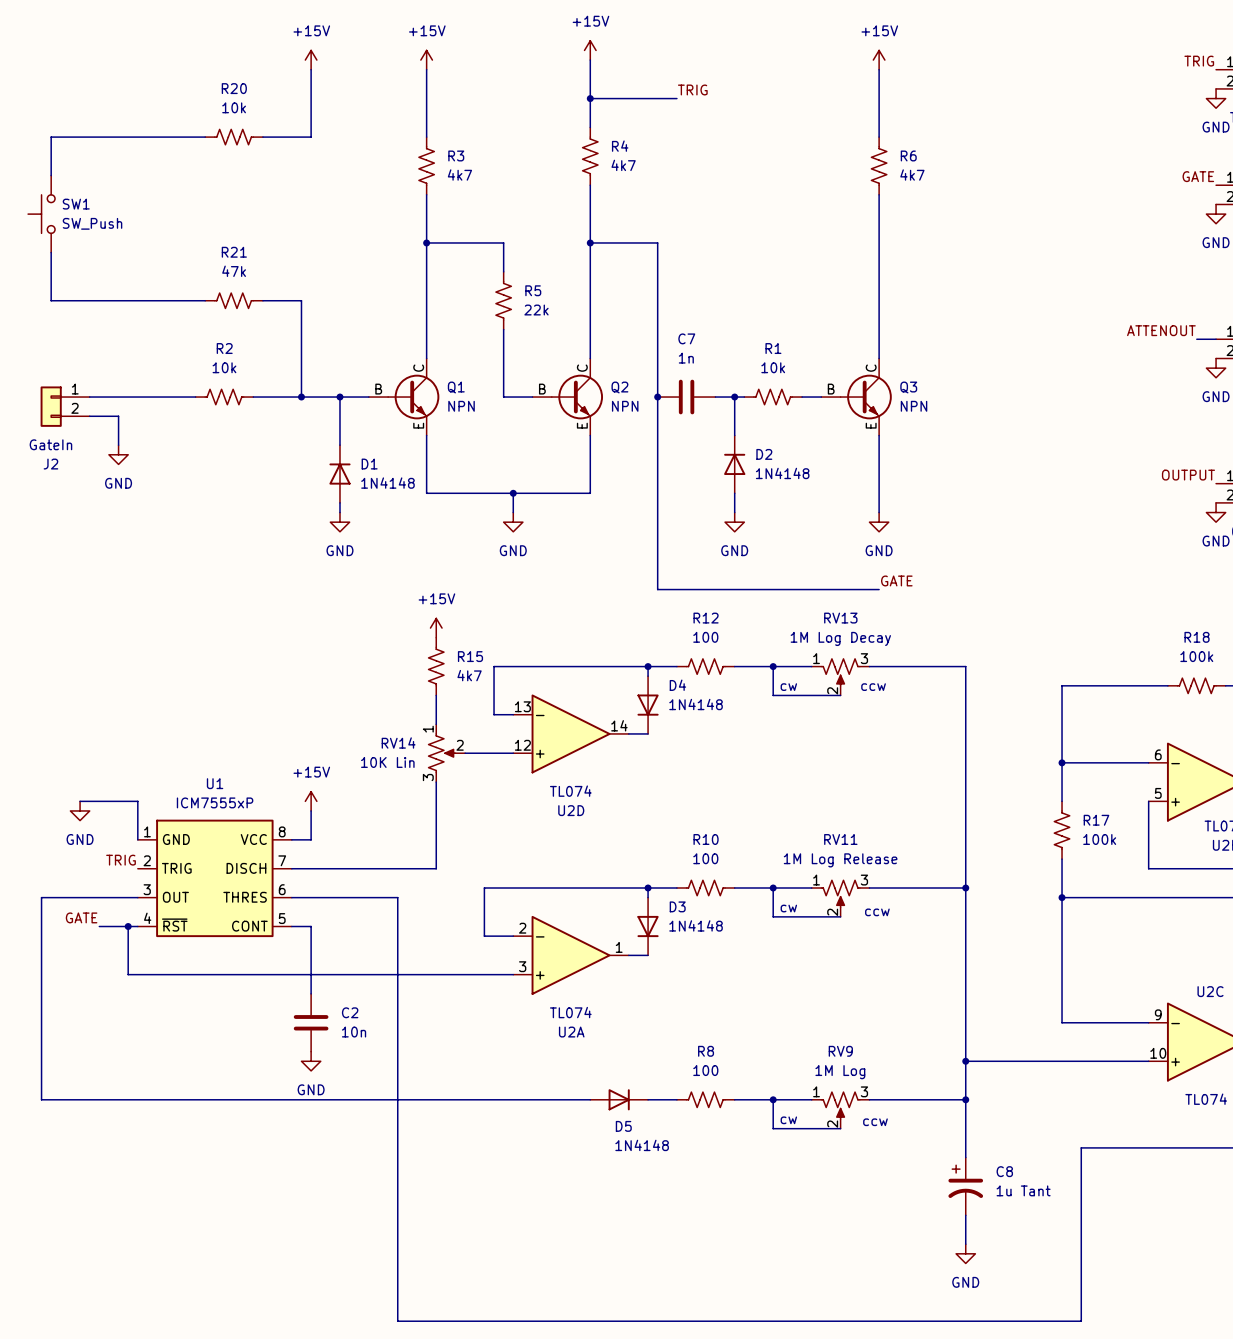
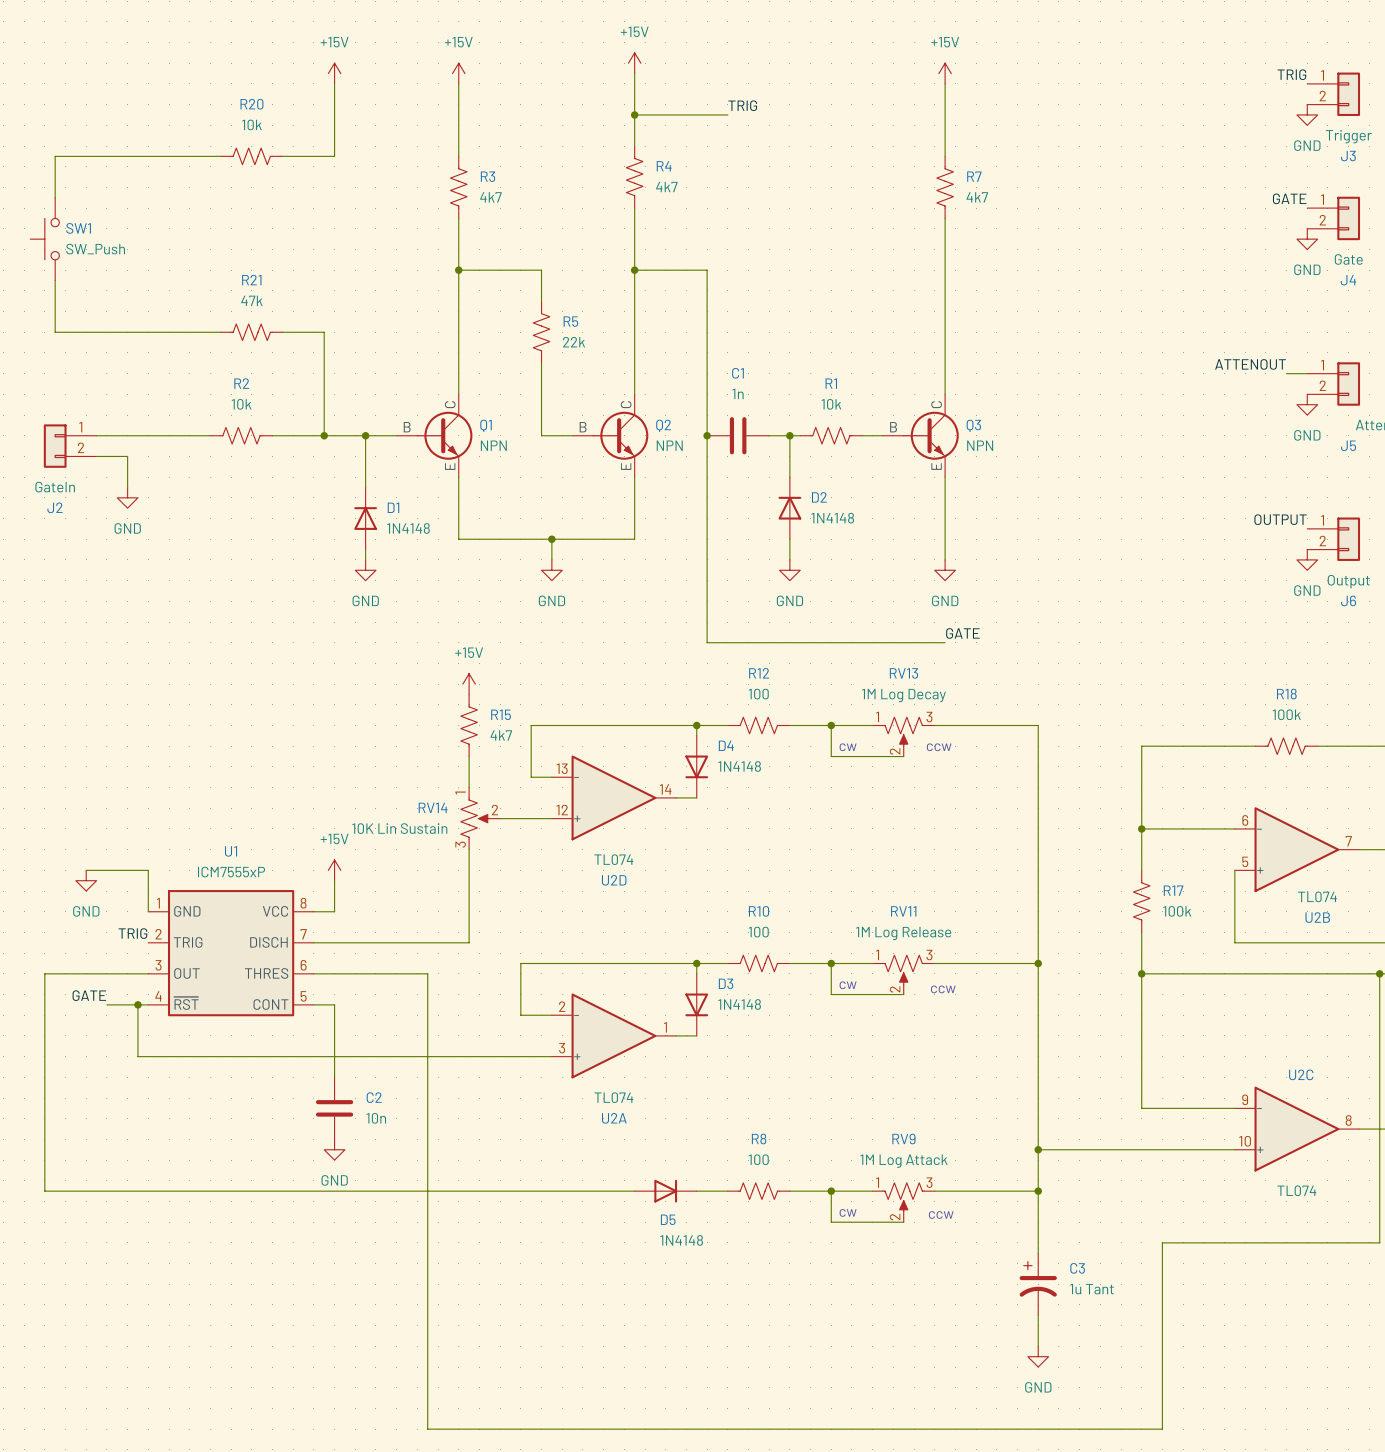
R6 name: R6 (908, 155) -> R7 (974, 176)
C7 name: C7 (686, 338) -> C1 (737, 373)
RV14 value: 10K Lin (387, 762) -> 10K Lin Sustain (399, 828)
RV9 value: 1M Log (840, 1072) -> 1M Log Attack (903, 1161)
C8 name: C8 (1004, 1171) -> C3 (1077, 1268)

